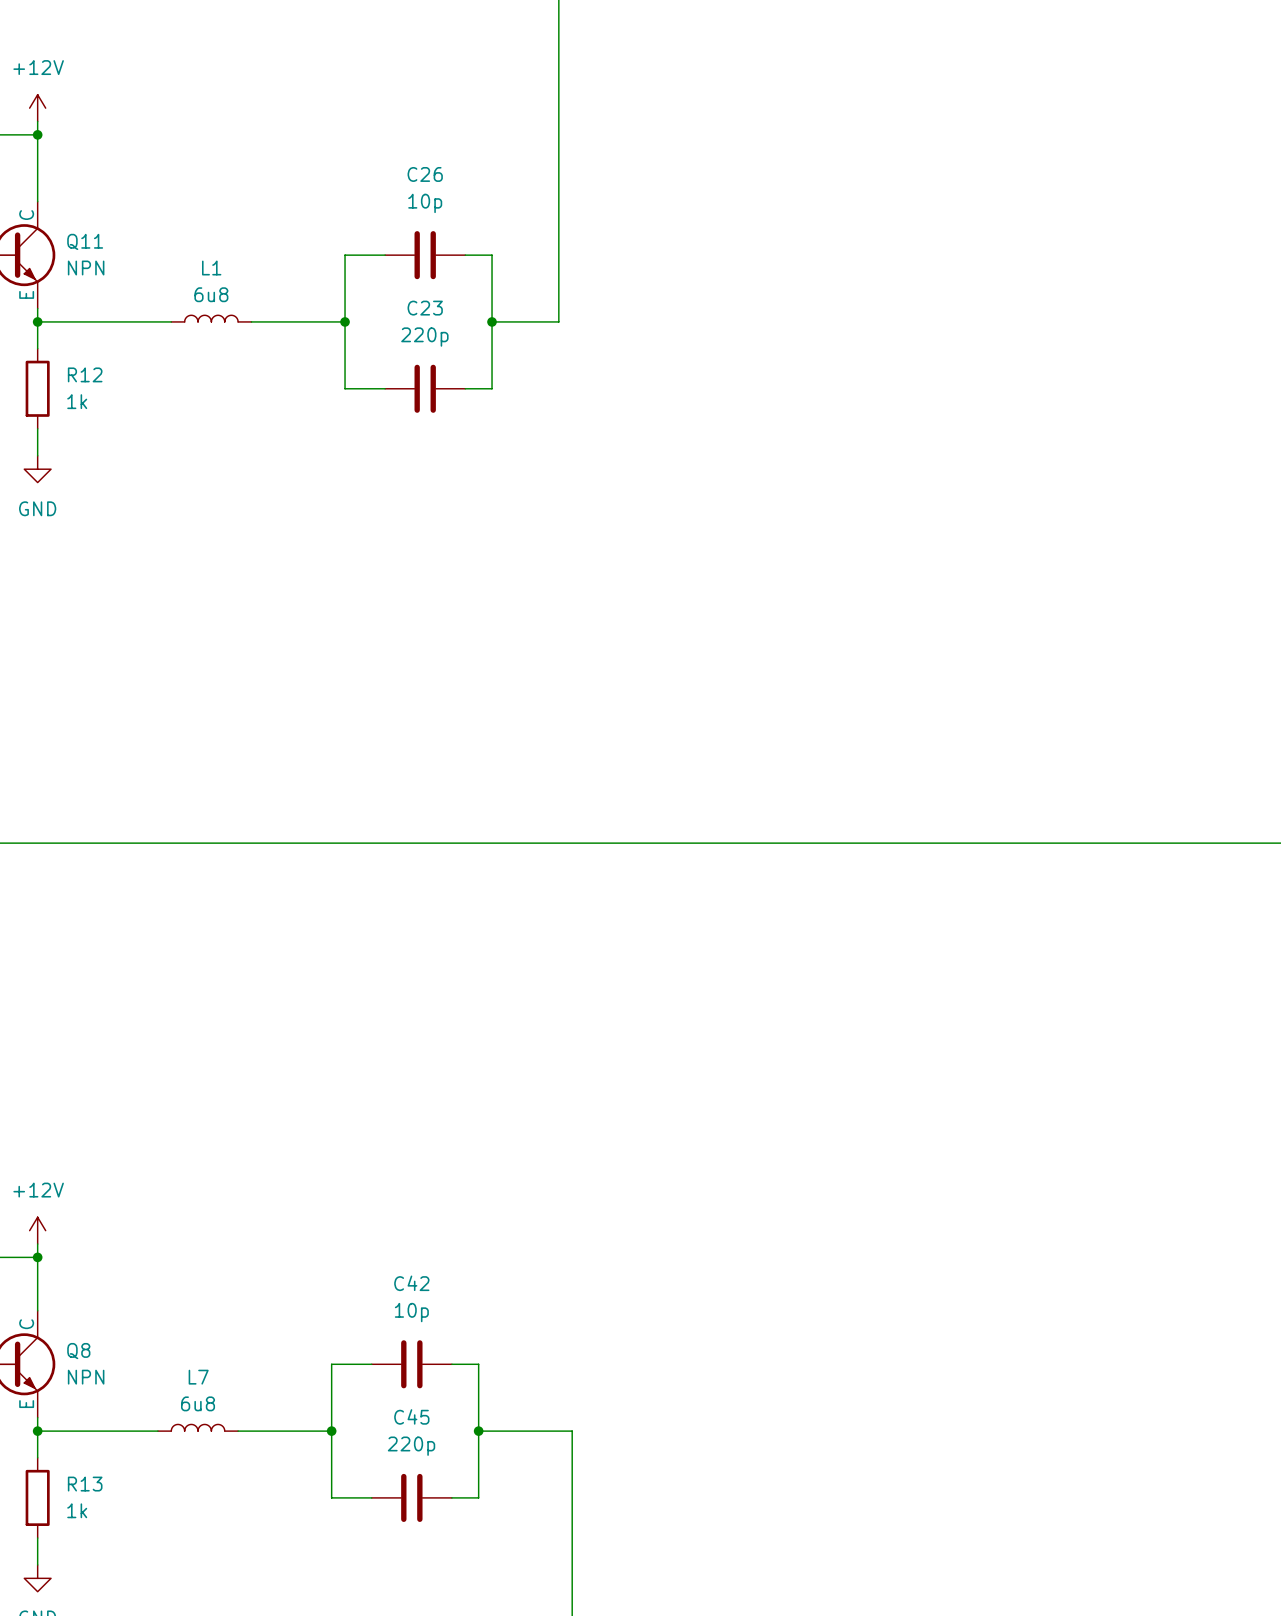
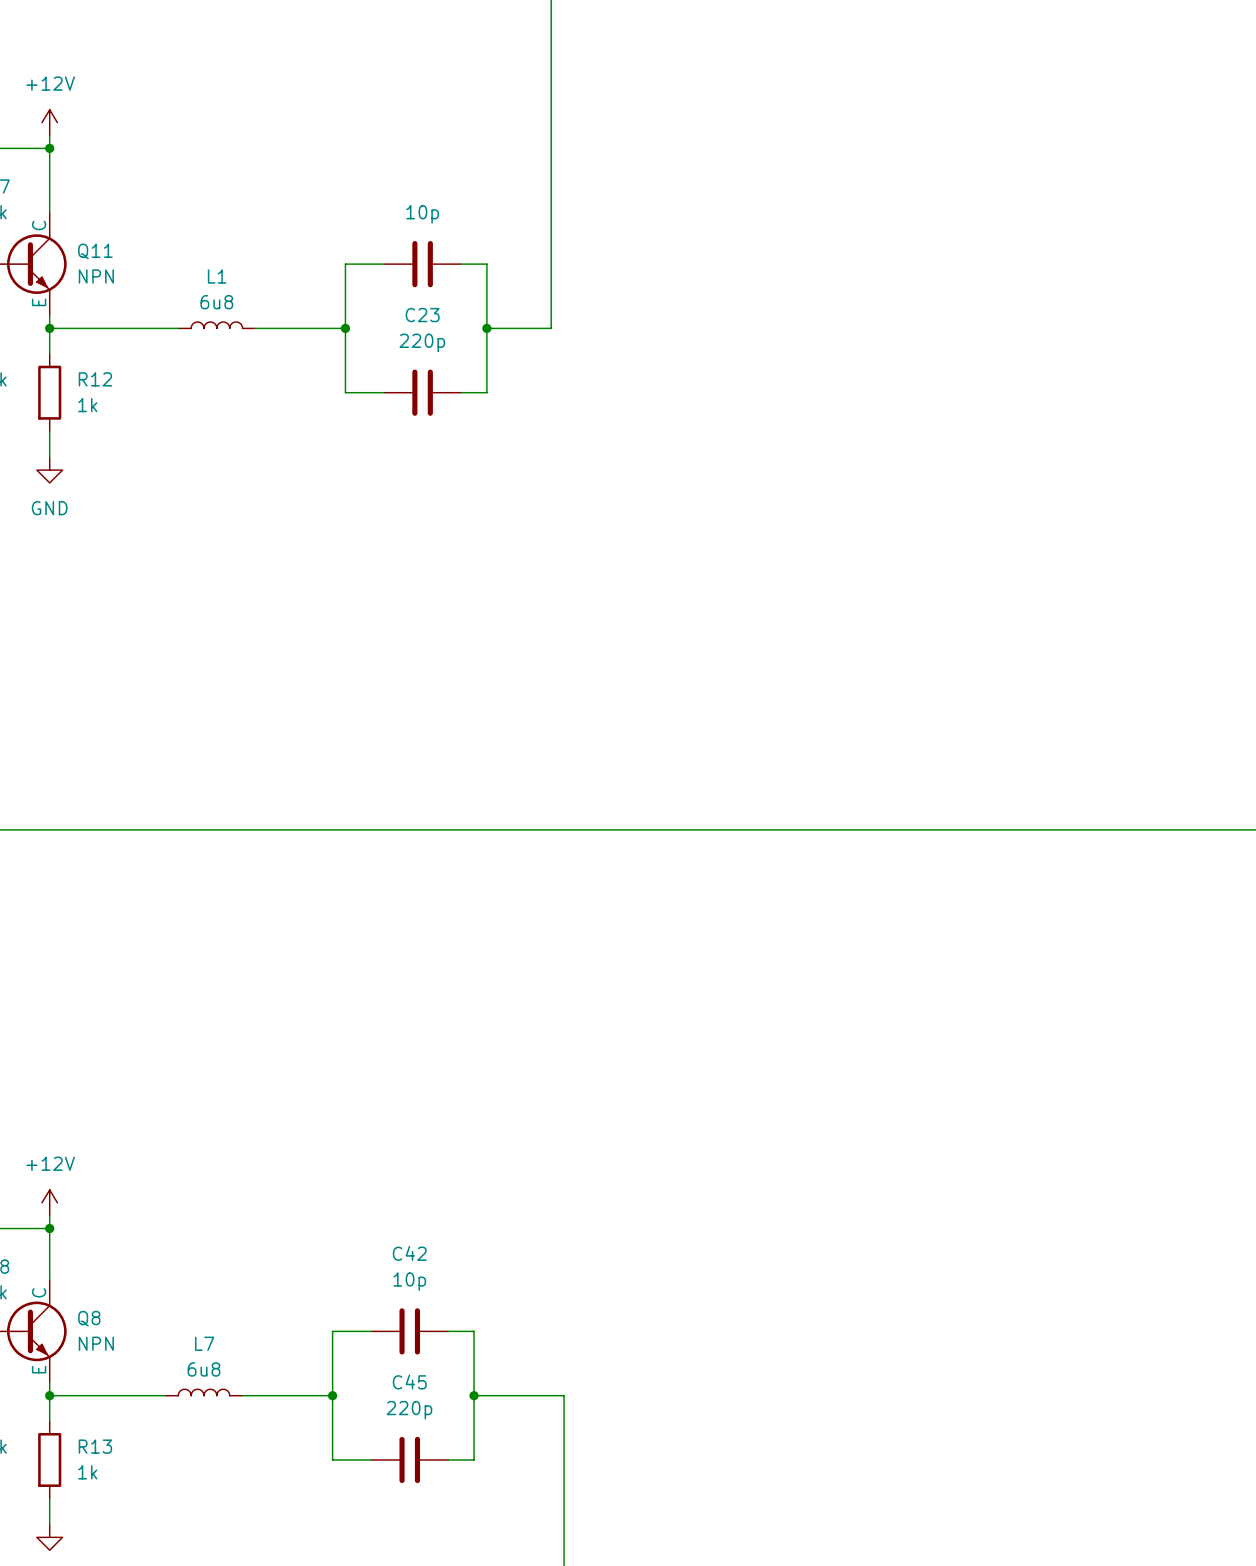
C26 name: C26 (425, 174) -> none

